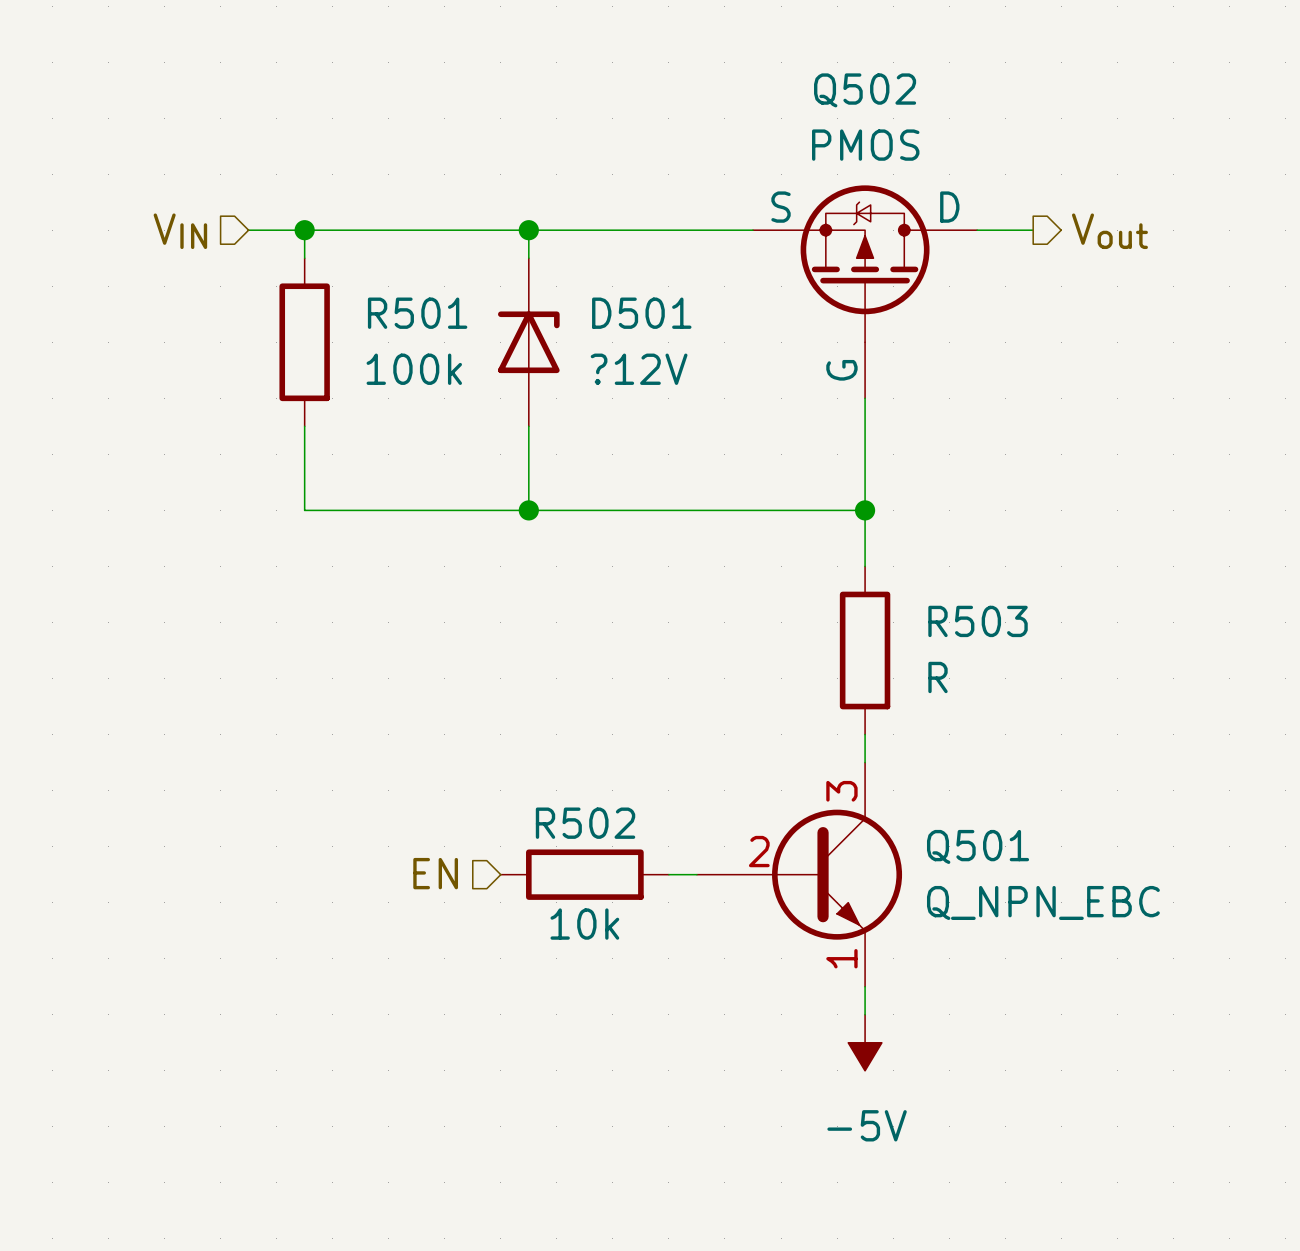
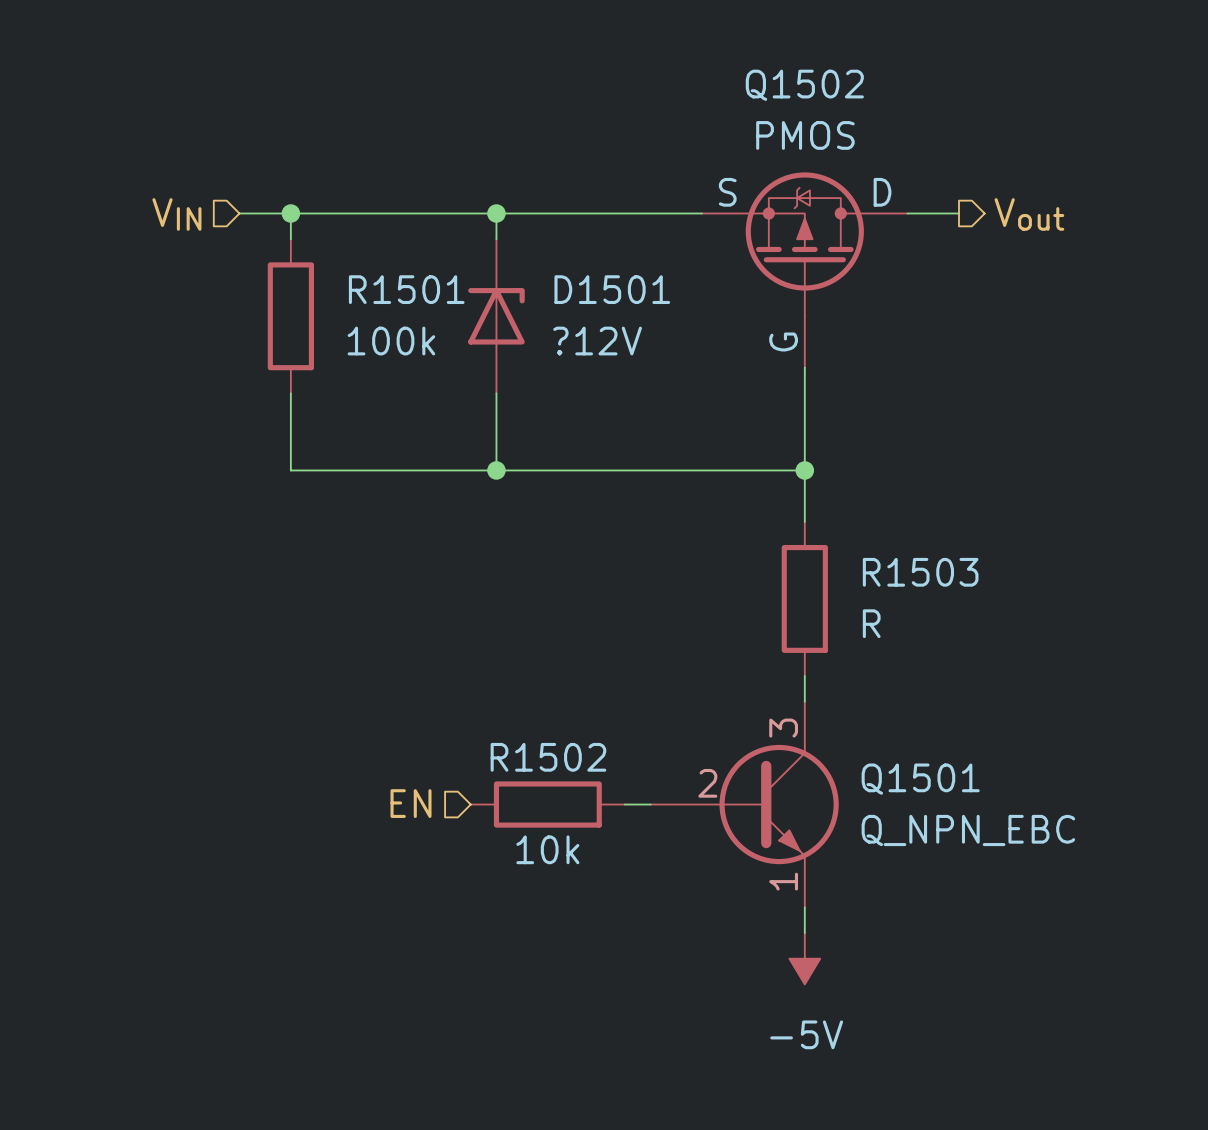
Q502 name: Q502 (865, 90) -> Q1502 (804, 85)
R501 name: R501 (417, 313) -> R1501 (406, 289)
D501 name: D501 (641, 313) -> D1501 (612, 289)
R503 name: R503 (978, 621) -> R1503 (920, 572)
R502 name: R502 (585, 823) -> R1502 (548, 757)
Q501 name: Q501 (978, 846) -> Q1501 (920, 779)

